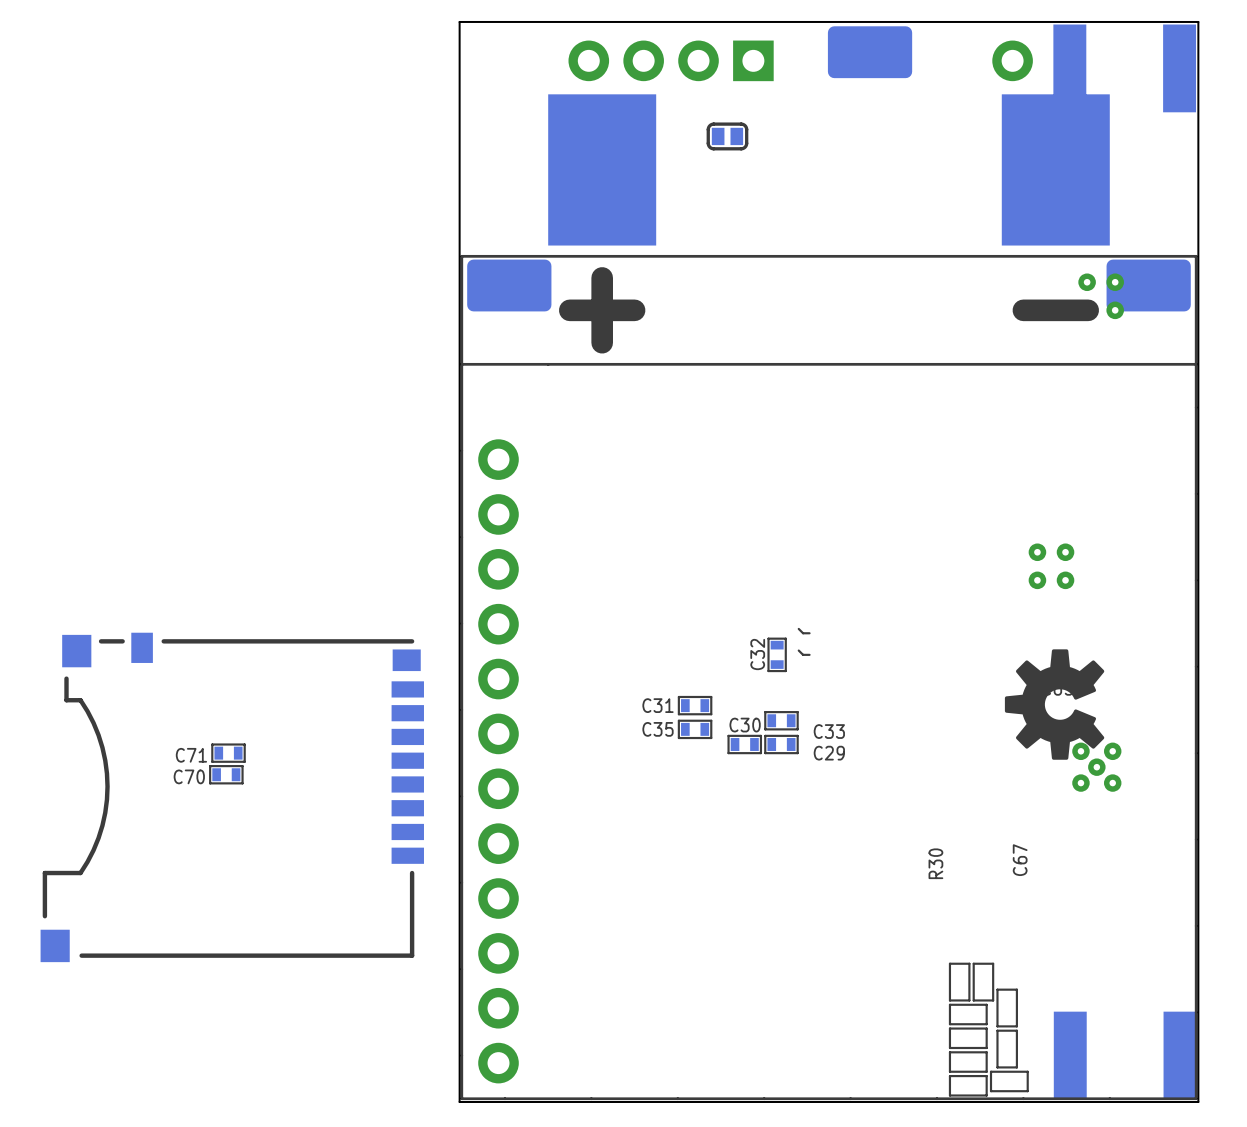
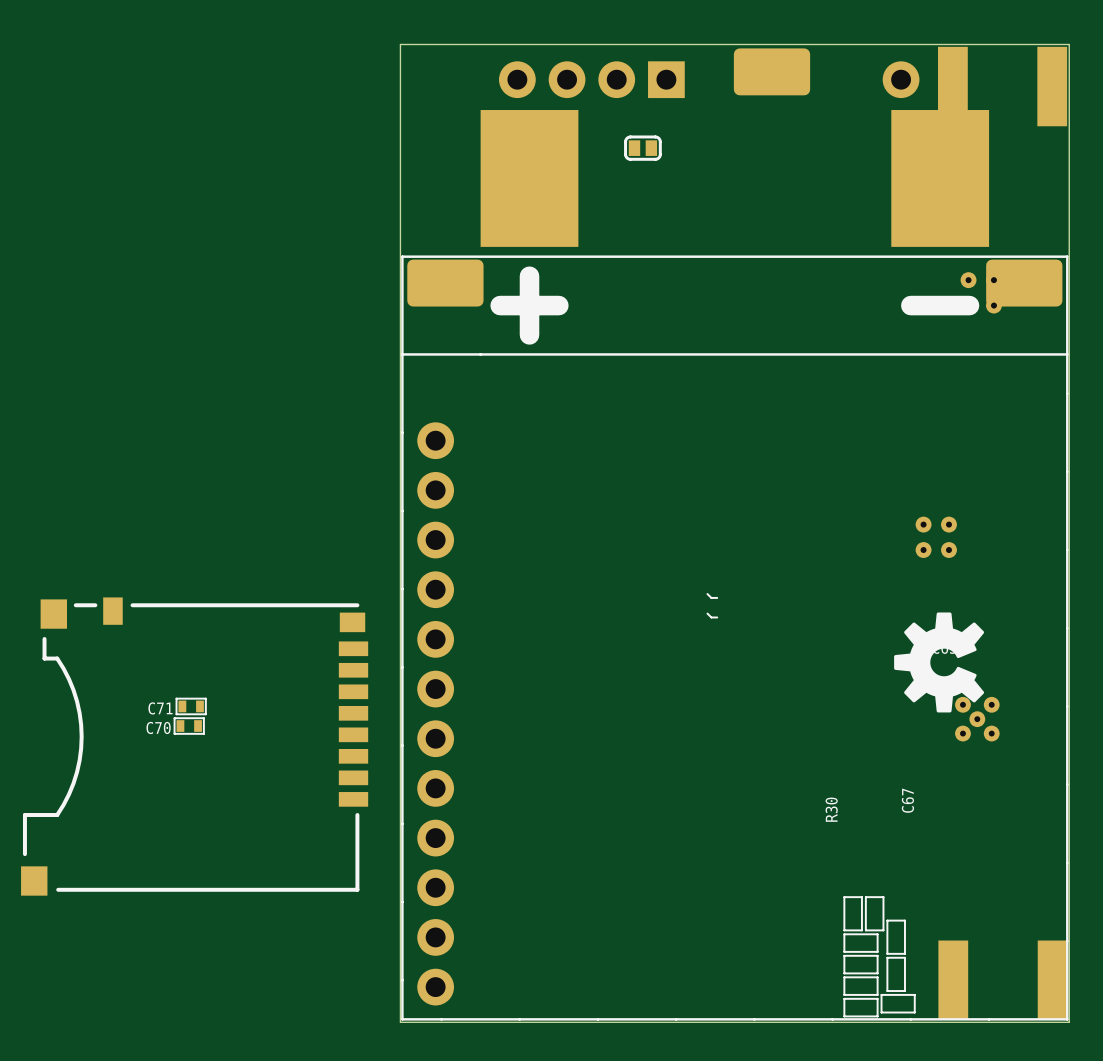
C32: (777, 654) -> none
C31: (695, 705) -> none
C33: (781, 720) -> none
C35: (695, 729) -> none
C30: (744, 744) -> none
C29: (781, 744) -> none

